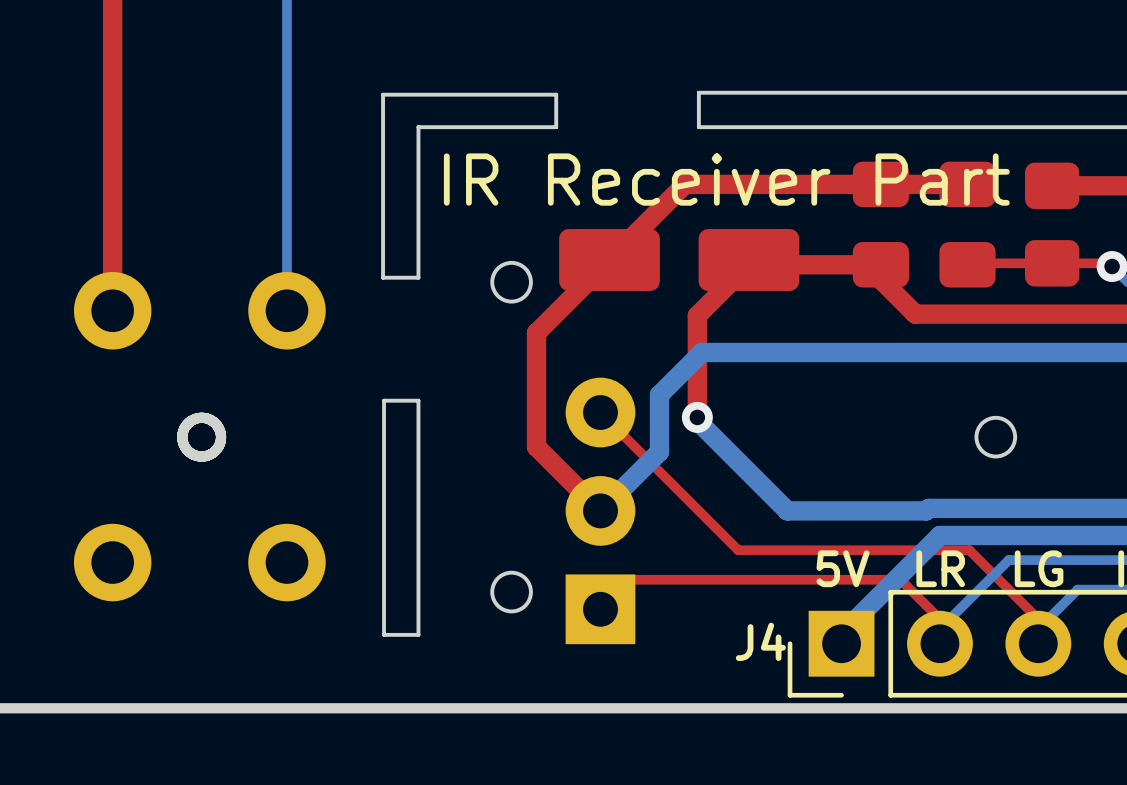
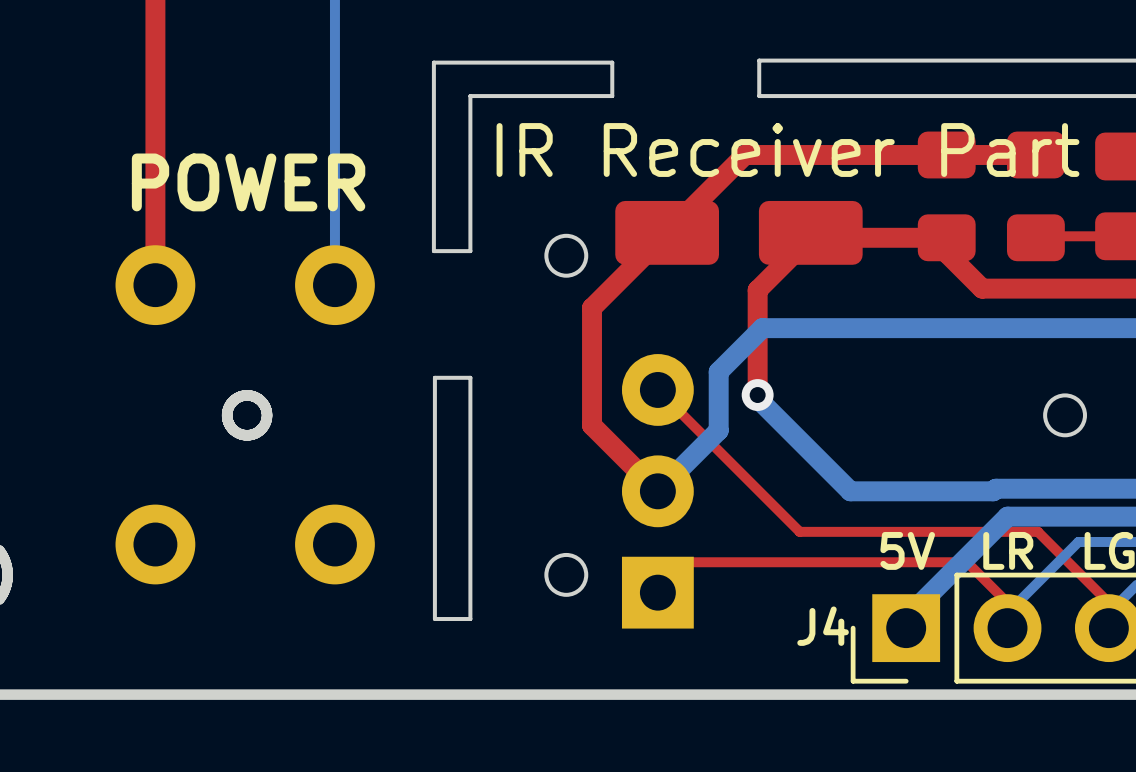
text: none -> POWER (248, 182)

